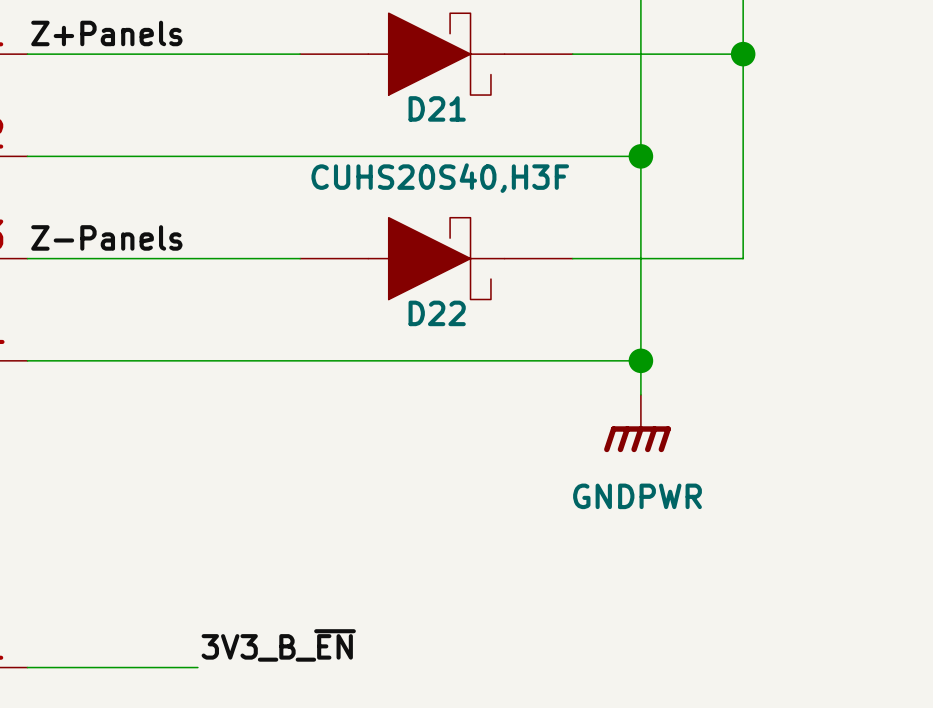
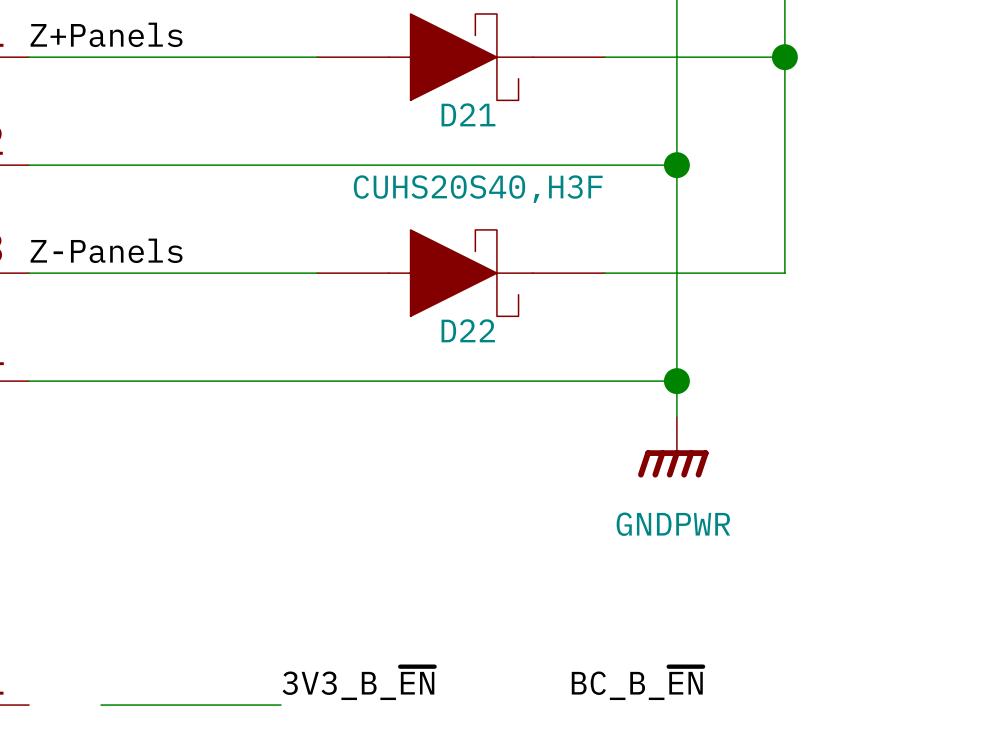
label position: 3V3_B_~{EN} (278, 645) -> 3V3_B_~{EN} (358, 683)
label: none -> BC_B_~{EN} (637, 683)
wire: (27, 667) (95, 667) -> (209, 705) (280, 705)

